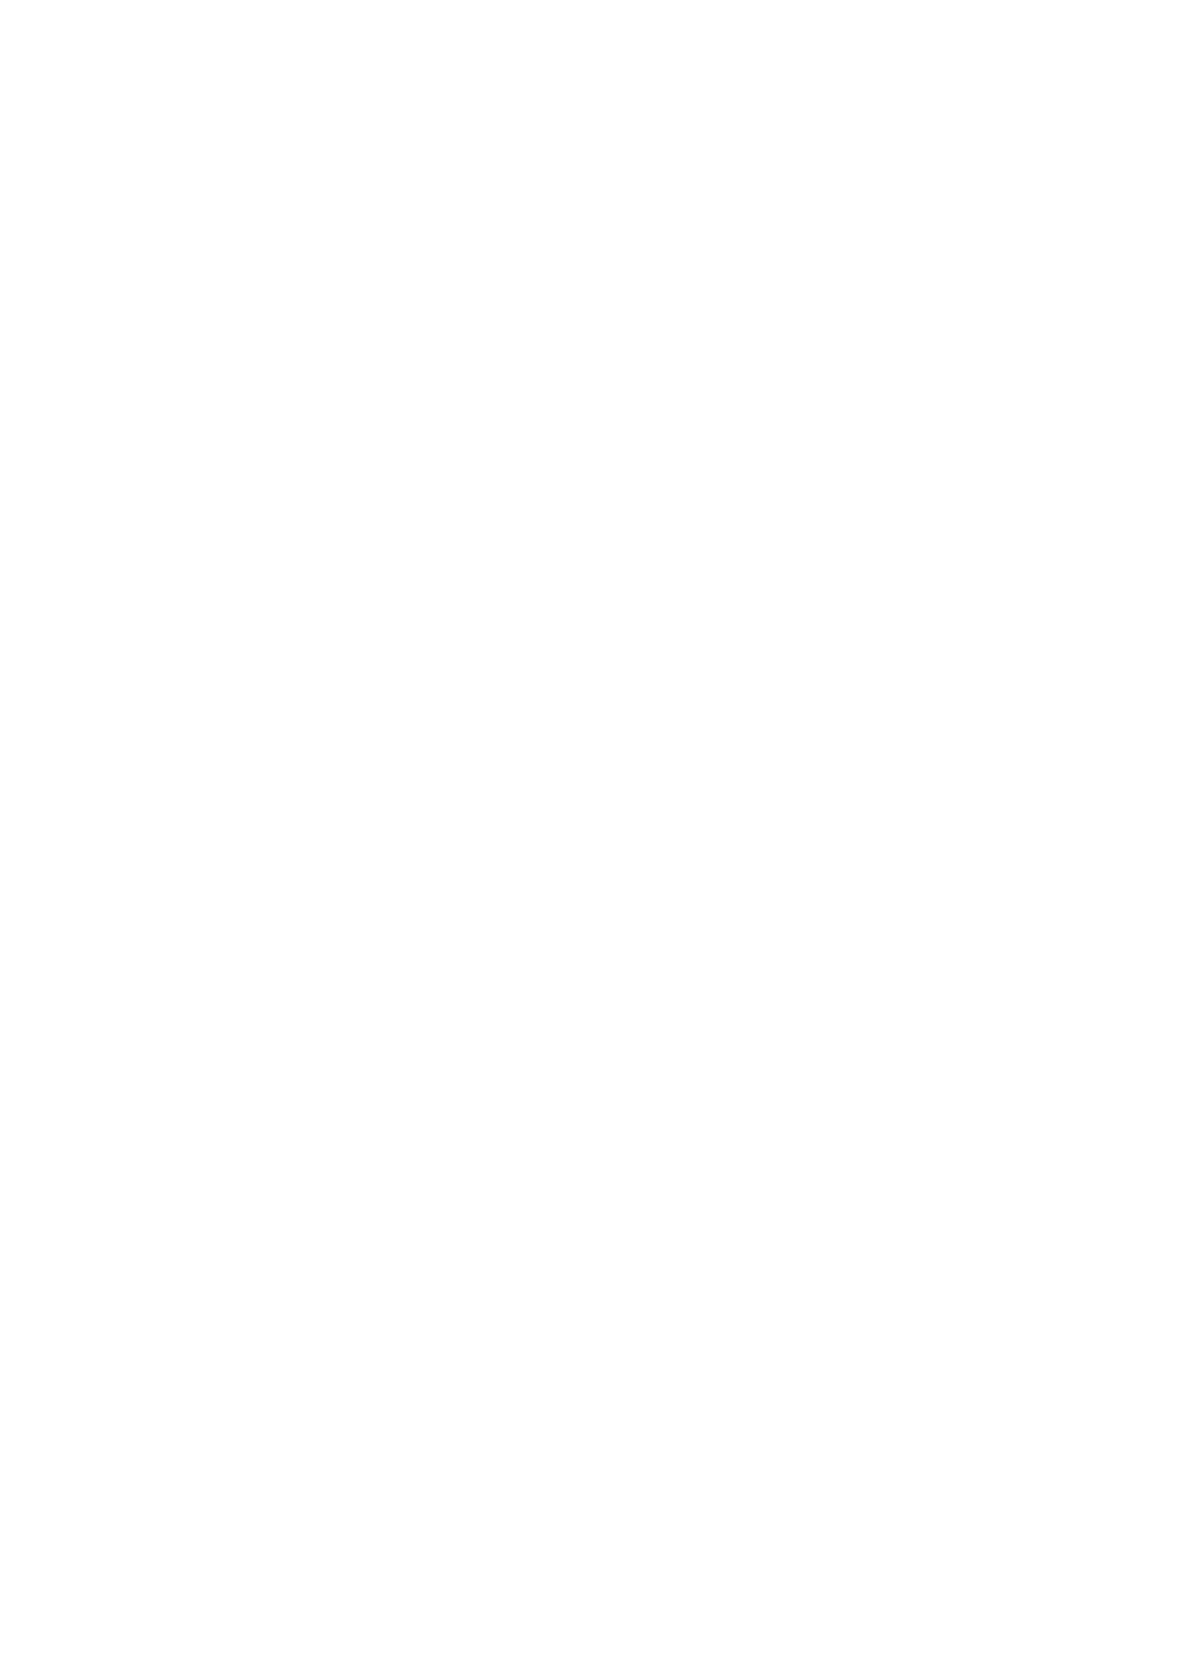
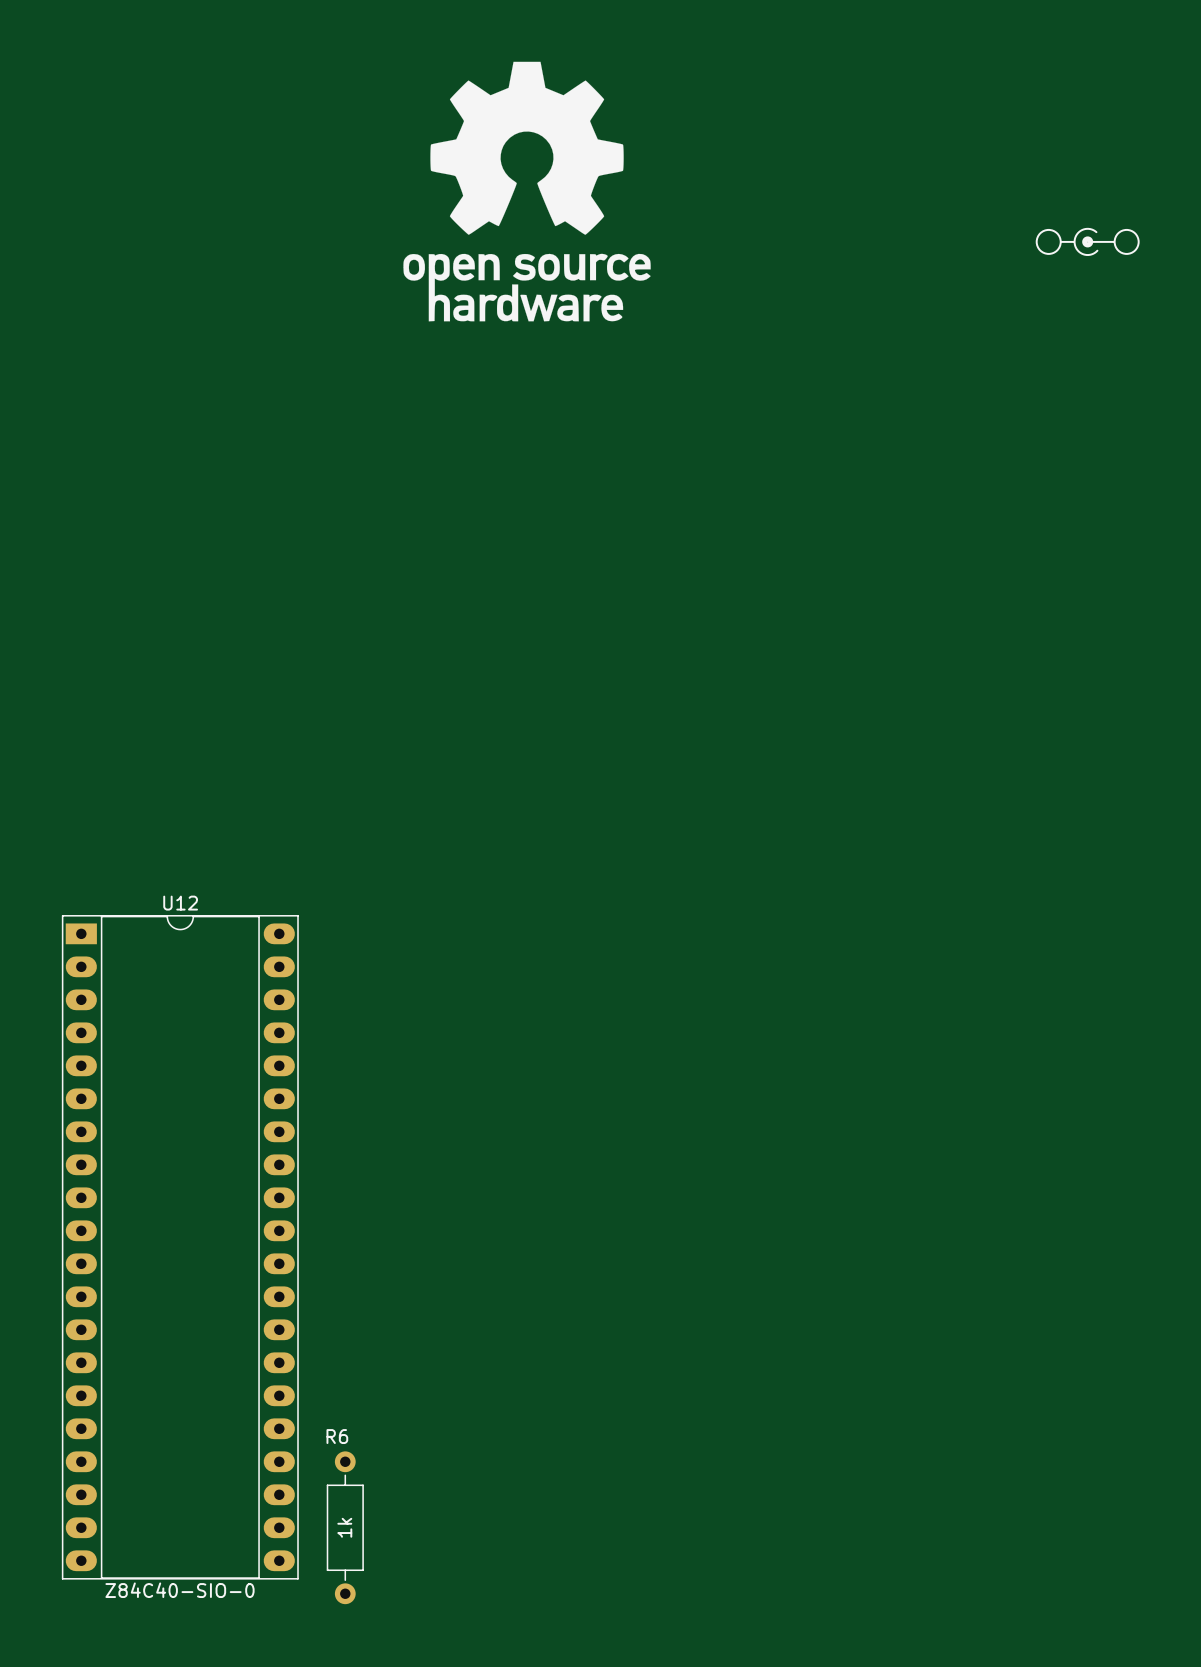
drawing: none -> [403, 61, 651, 322]
drawing: none -> [1035, 227, 1140, 256]
U12: none -> Z84C40-SIO-0 (180, 1247)
R6: none -> 1k (345, 1527)

